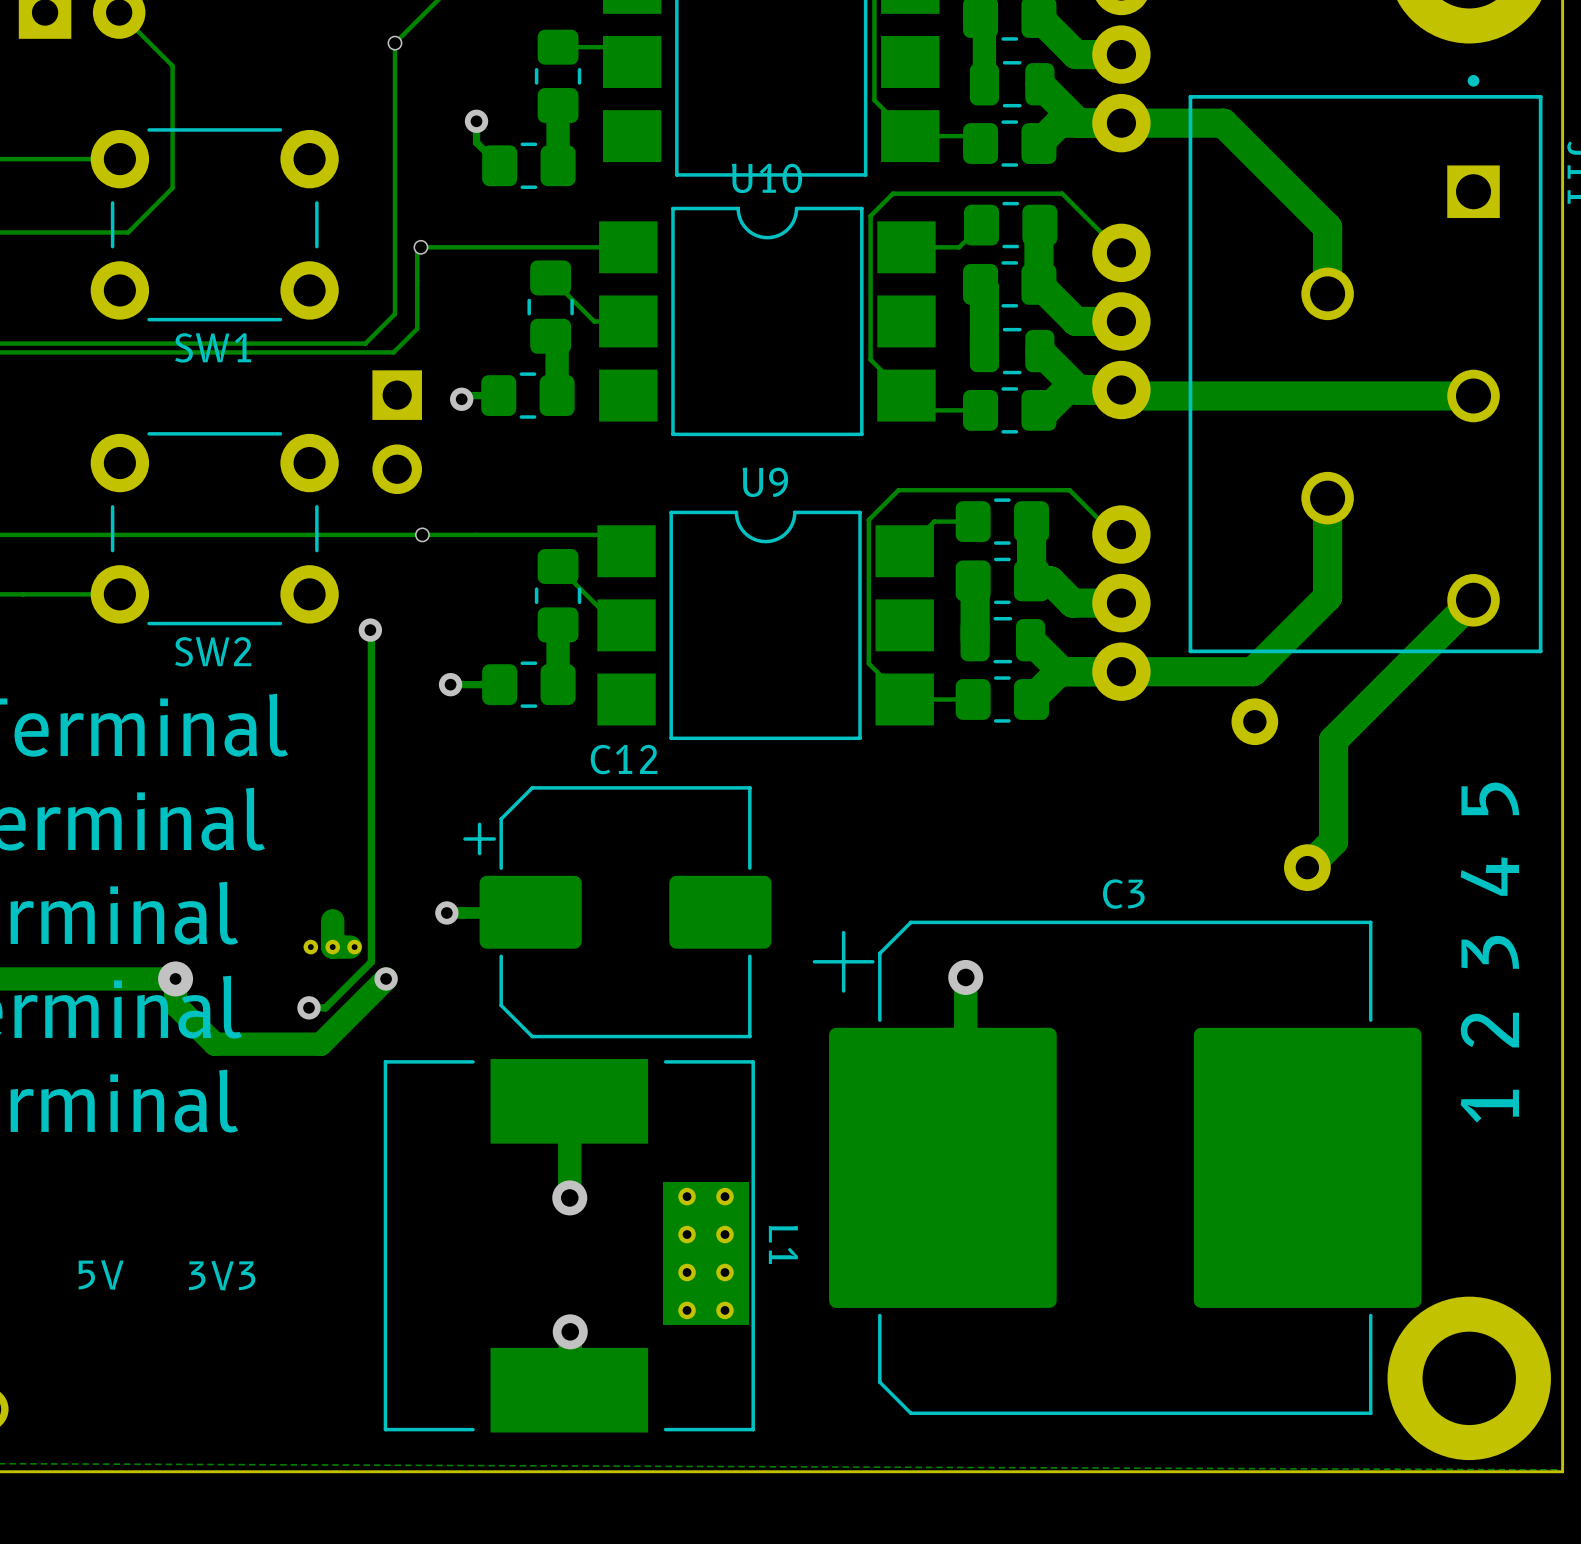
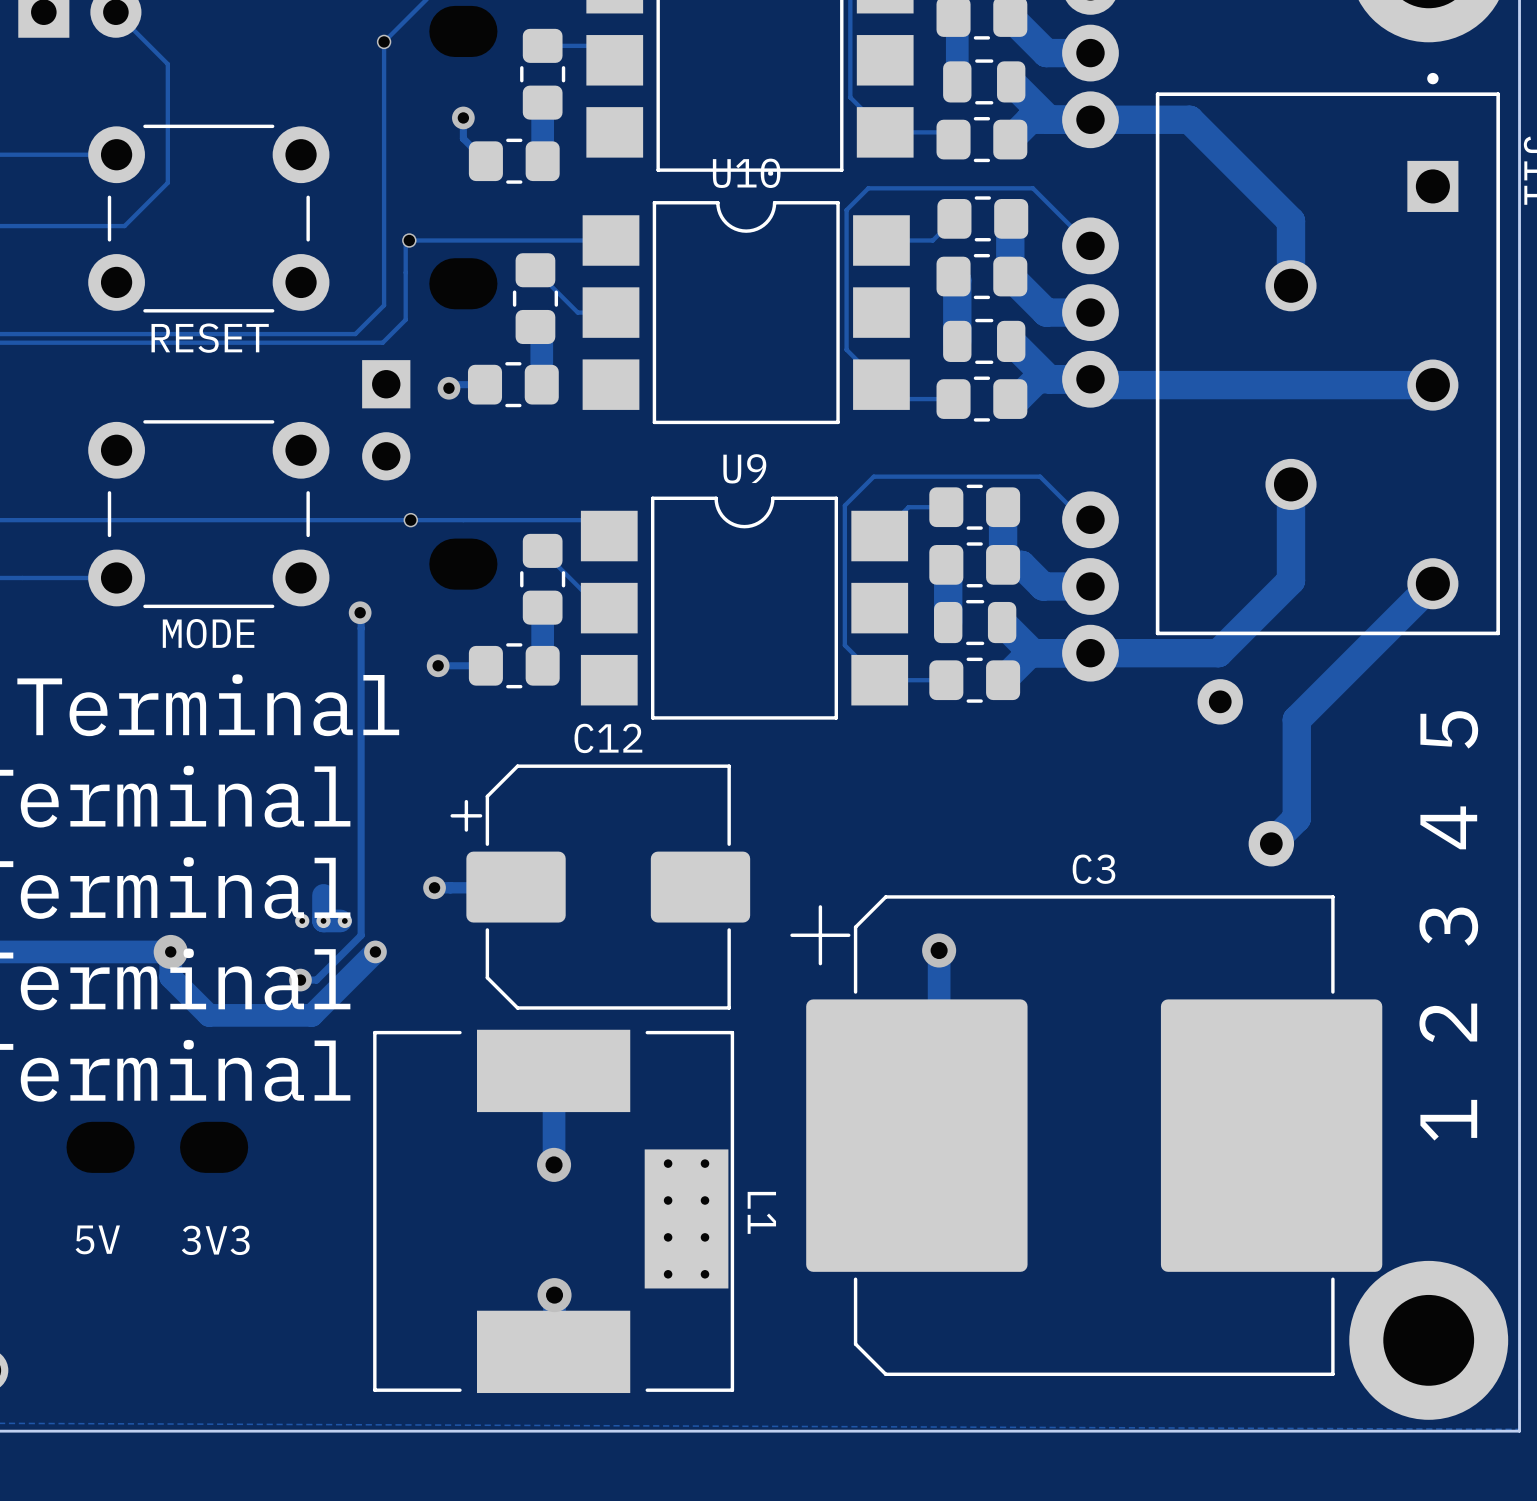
SW1 name: SW1 (213, 347) -> RESET (210, 338)
SW2 name: SW2 (213, 651) -> MODE (208, 633)

